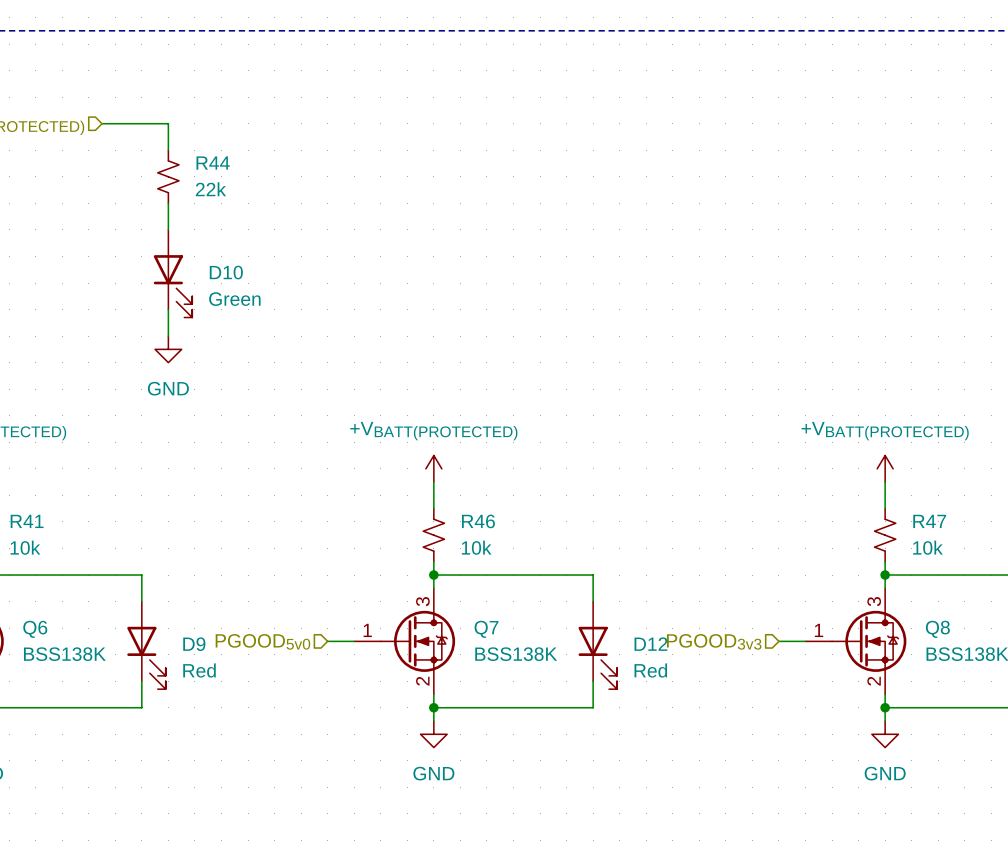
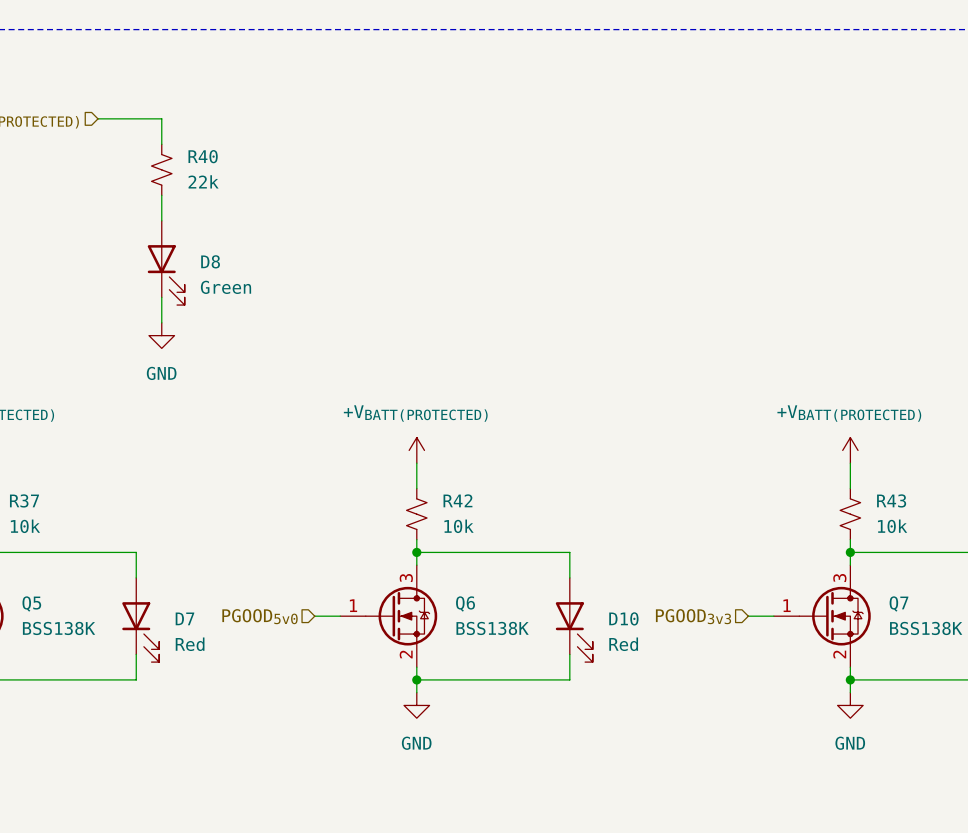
R44 name: R44 (213, 163) -> R40 (203, 156)
D10 name: D10 (226, 272) -> D8 (210, 261)
R41 name: R41 (27, 521) -> R37 (24, 500)
R46 name: R46 (478, 521) -> R42 (457, 500)
R47 name: R47 (929, 521) -> R43 (891, 500)
Q6 name: Q6 (35, 629) -> Q5 (31, 603)
Q7 name: Q7 (486, 629) -> Q6 (465, 603)
Q8 name: Q8 (937, 629) -> Q7 (898, 603)
D9 name: D9 (194, 644) -> D7 (184, 618)
D12 name: D12 (650, 644) -> D10 (623, 618)

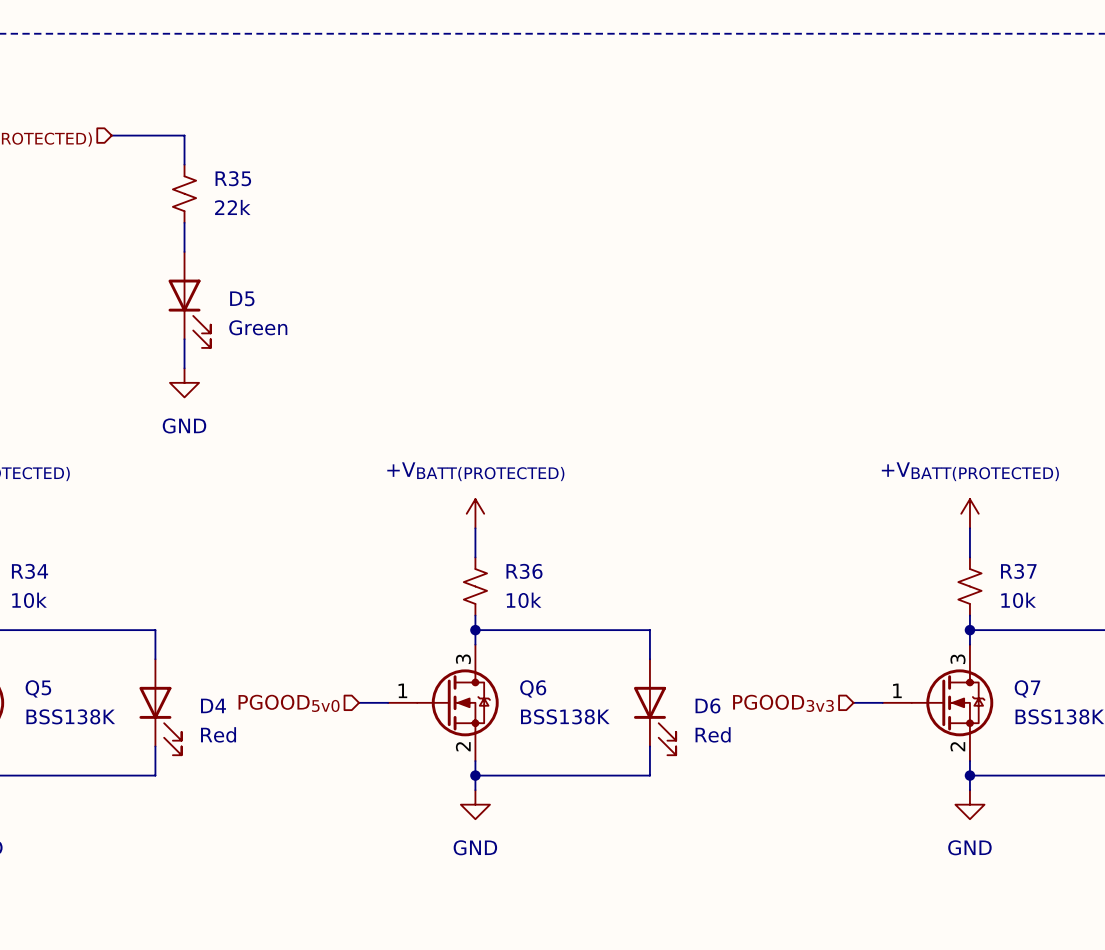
R40 name: R40 (203, 156) -> R35 (233, 178)
D8 name: D8 (210, 261) -> D5 (242, 298)
R37 name: R37 (24, 500) -> R34 (30, 571)
R42 name: R42 (457, 500) -> R36 (524, 571)
R43 name: R43 (891, 500) -> R37 (1018, 571)
D7 name: D7 (184, 618) -> D4 (213, 705)
D10 name: D10 (623, 618) -> D6 (707, 705)

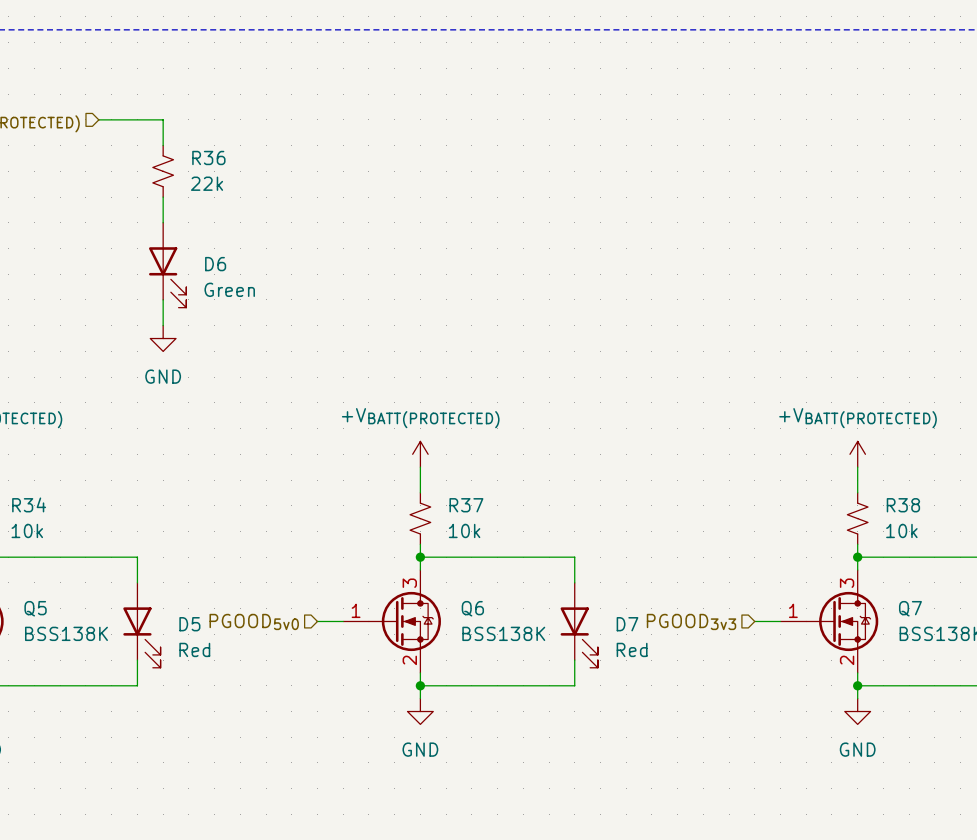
R35 name: R35 (233, 178) -> R36 (208, 157)
D5 name: D5 (242, 298) -> D6 (215, 264)
R36 name: R36 (524, 571) -> R37 (466, 505)
R37 name: R37 (1018, 571) -> R38 (903, 505)
D4 name: D4 (213, 705) -> D5 (189, 624)
D6 name: D6 (707, 705) -> D7 (627, 624)

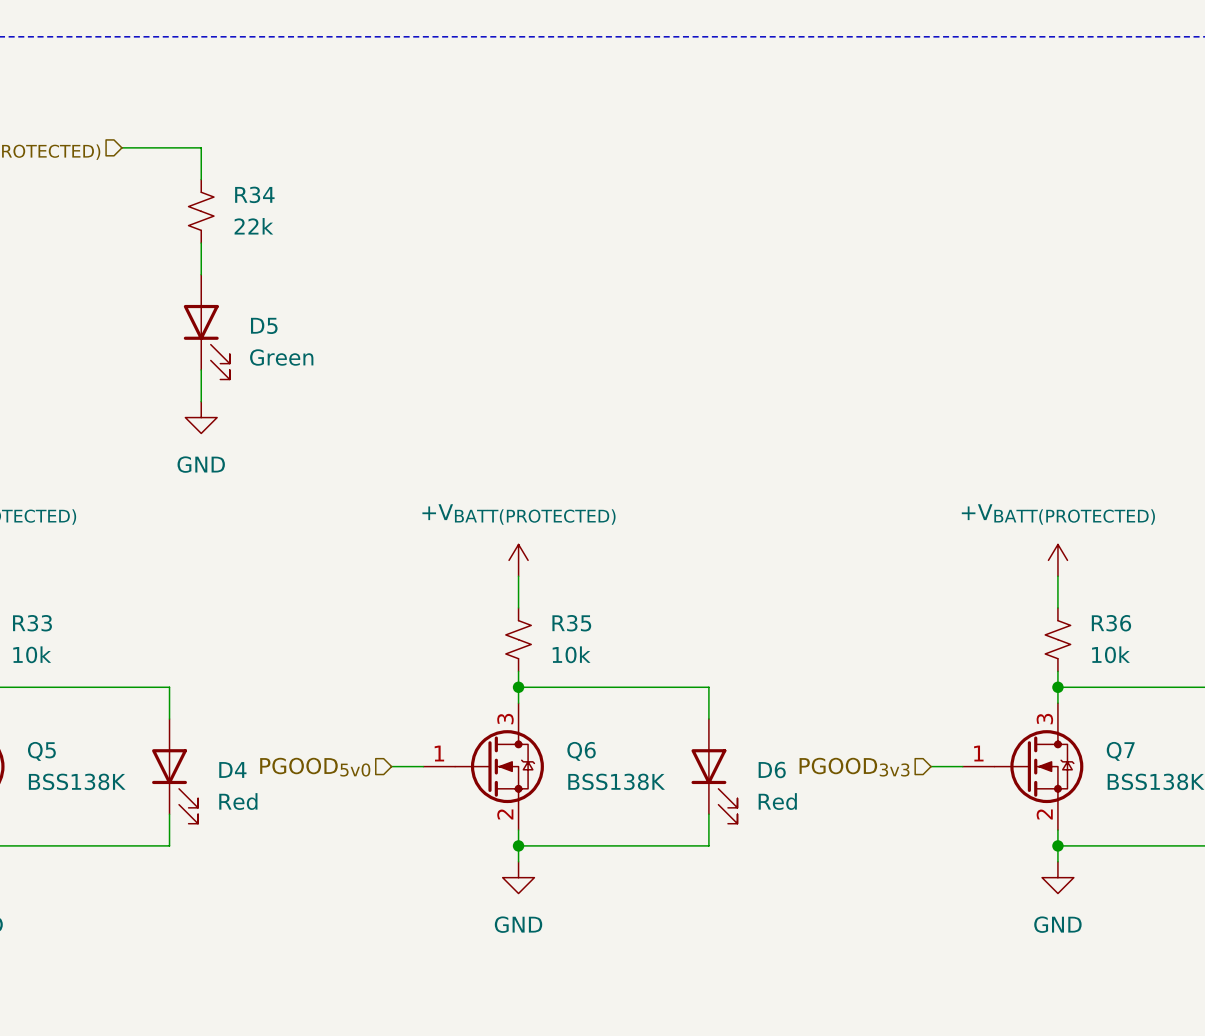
R36 name: R36 (208, 157) -> R34 (254, 194)
D6 name: D6 (215, 264) -> D5 (264, 325)
R34 name: R34 (29, 504) -> R33 (32, 623)
R37 name: R37 (466, 505) -> R35 (571, 623)
R38 name: R38 (903, 505) -> R36 (1111, 623)
D5 name: D5 (189, 624) -> D4 (232, 769)
D7 name: D7 (627, 624) -> D6 (772, 769)

